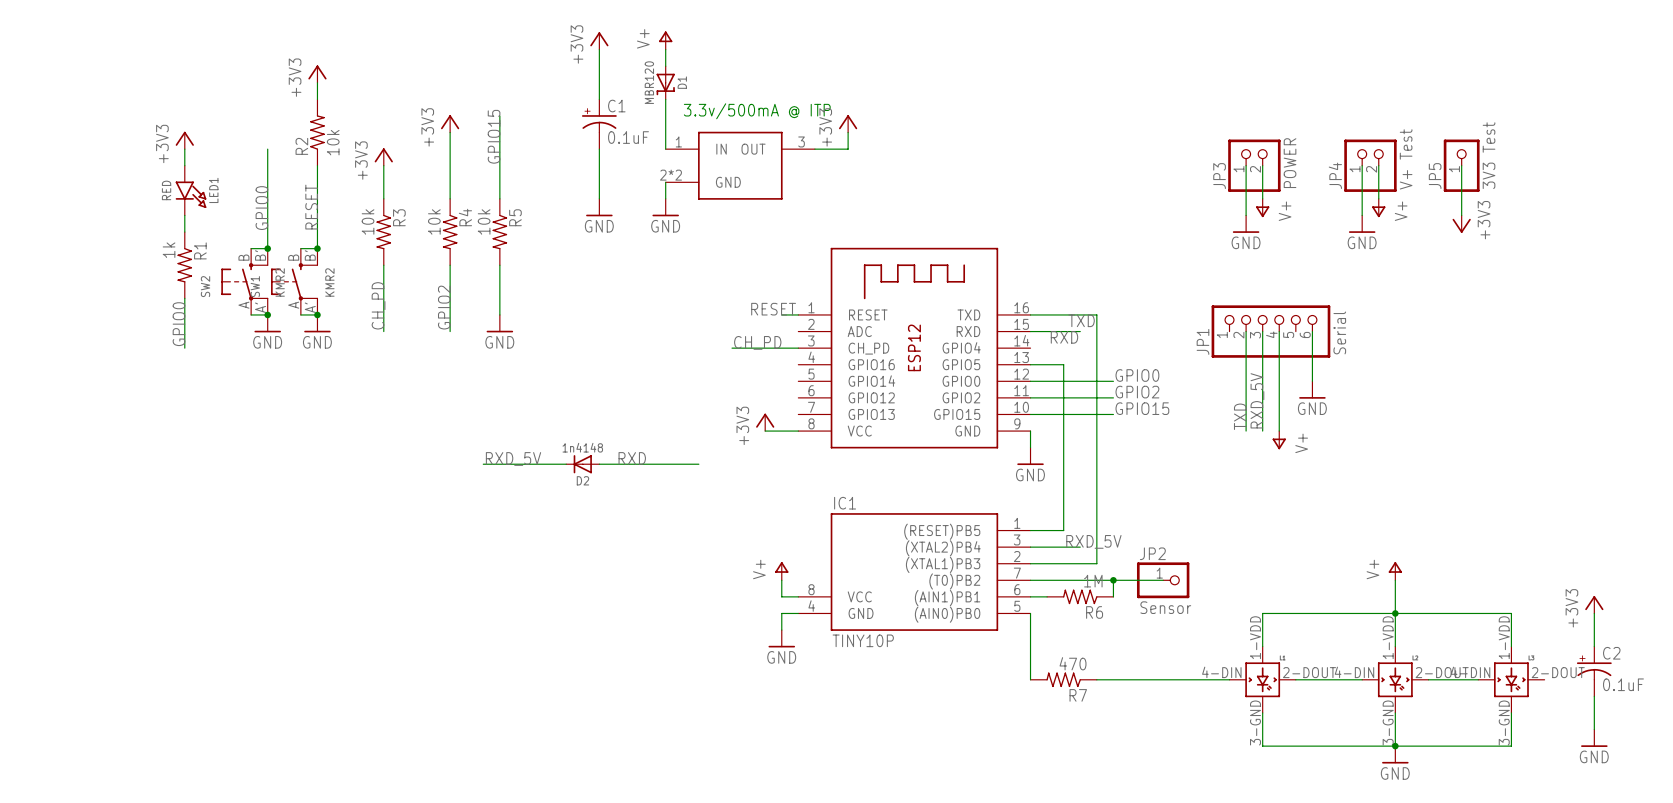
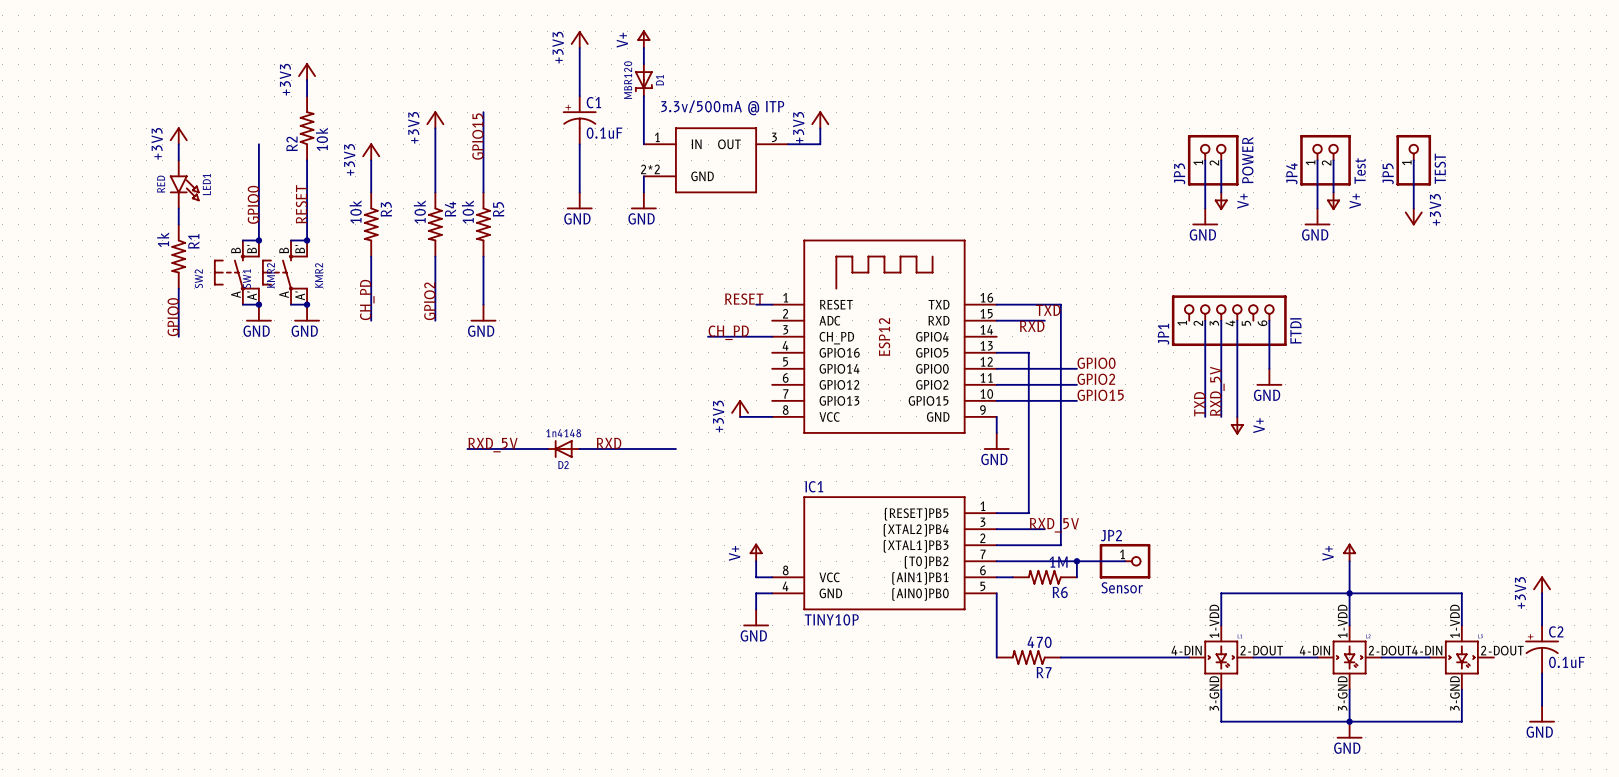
JP5 value: 3V3 Test (1489, 155) -> TEST (1440, 168)
JP4 value: V+ Test (1406, 159) -> Test (1360, 171)
JP1 value: Serial (1339, 332) -> FTDI (1295, 330)

